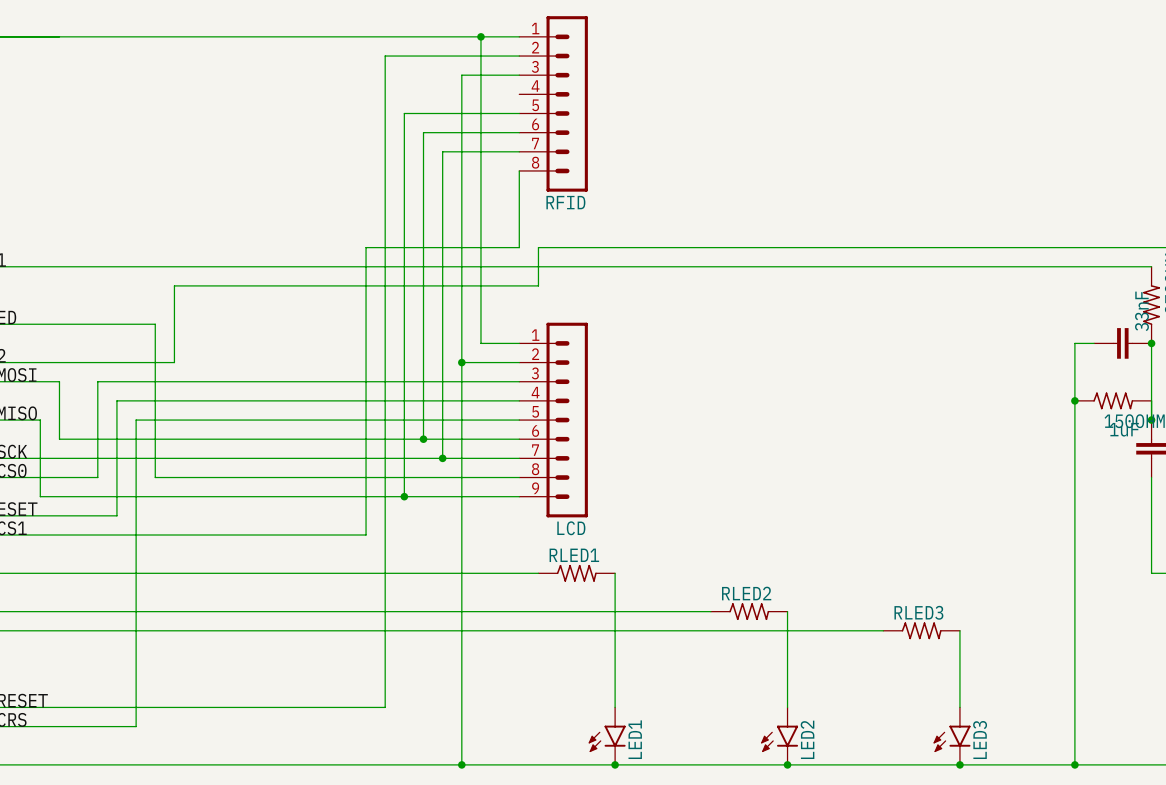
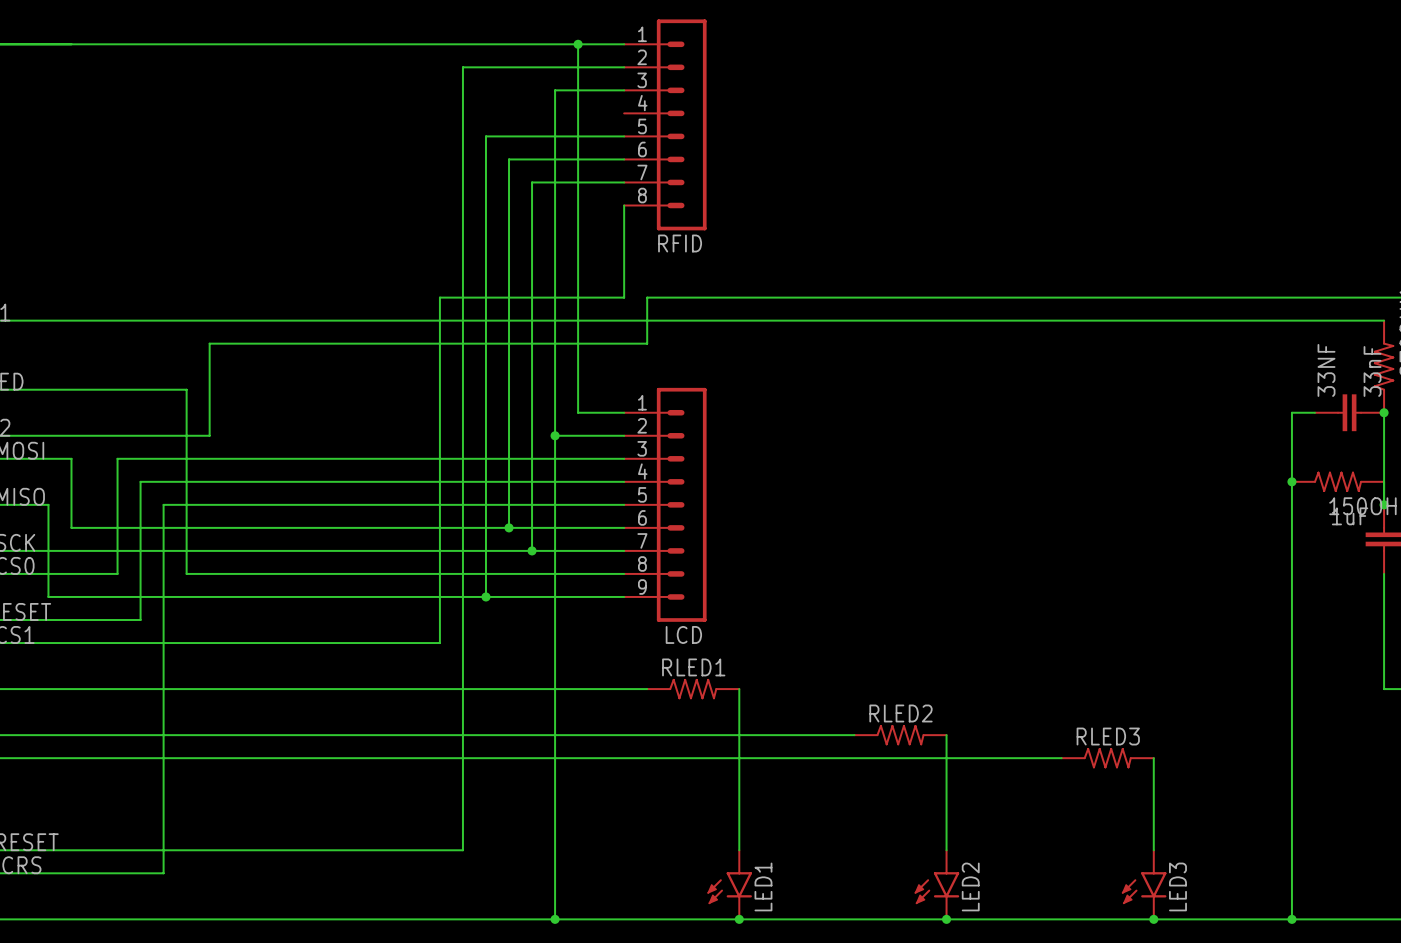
33NF name: none -> 33NF (1326, 370)

